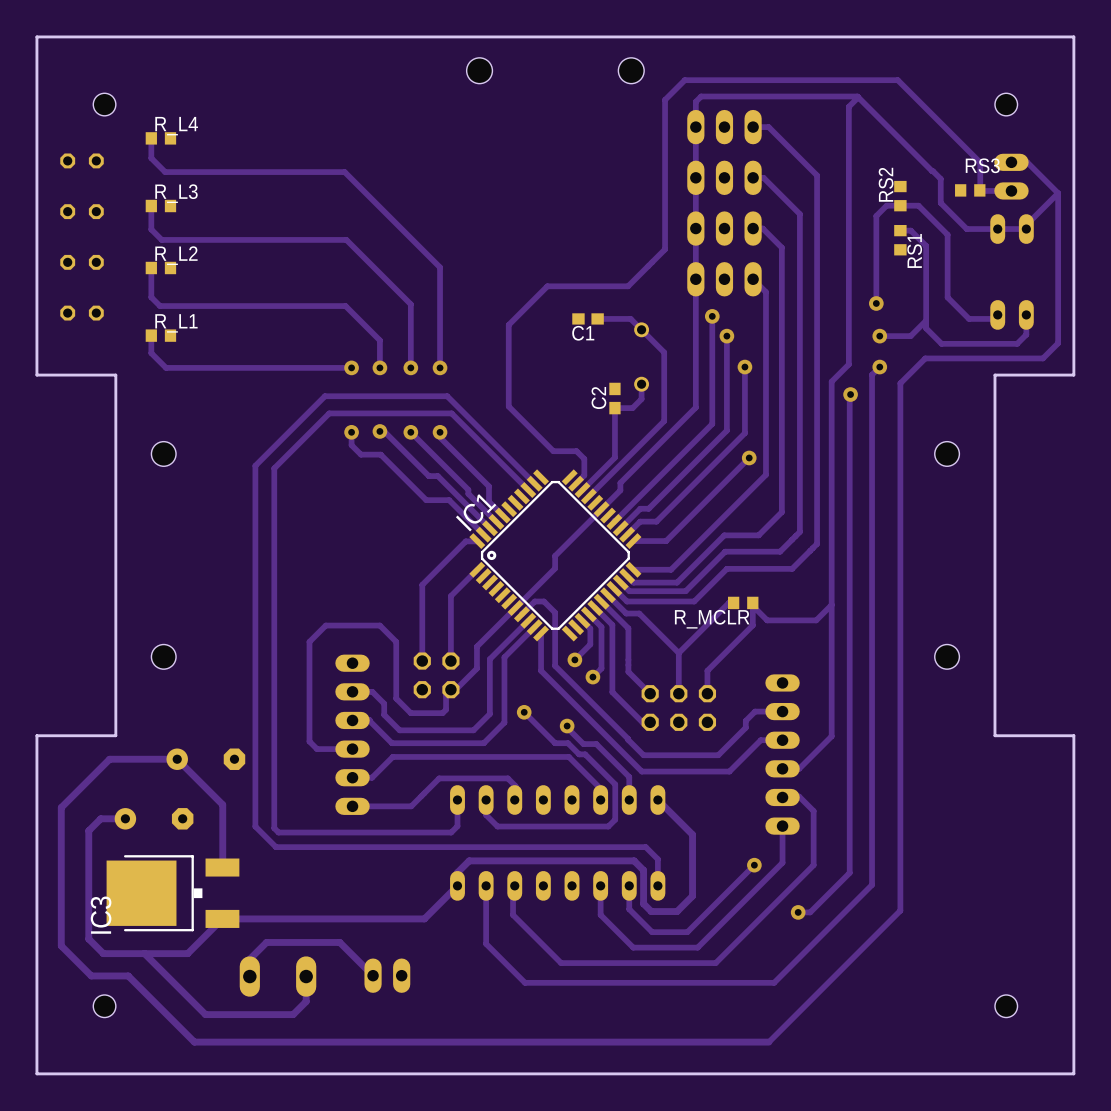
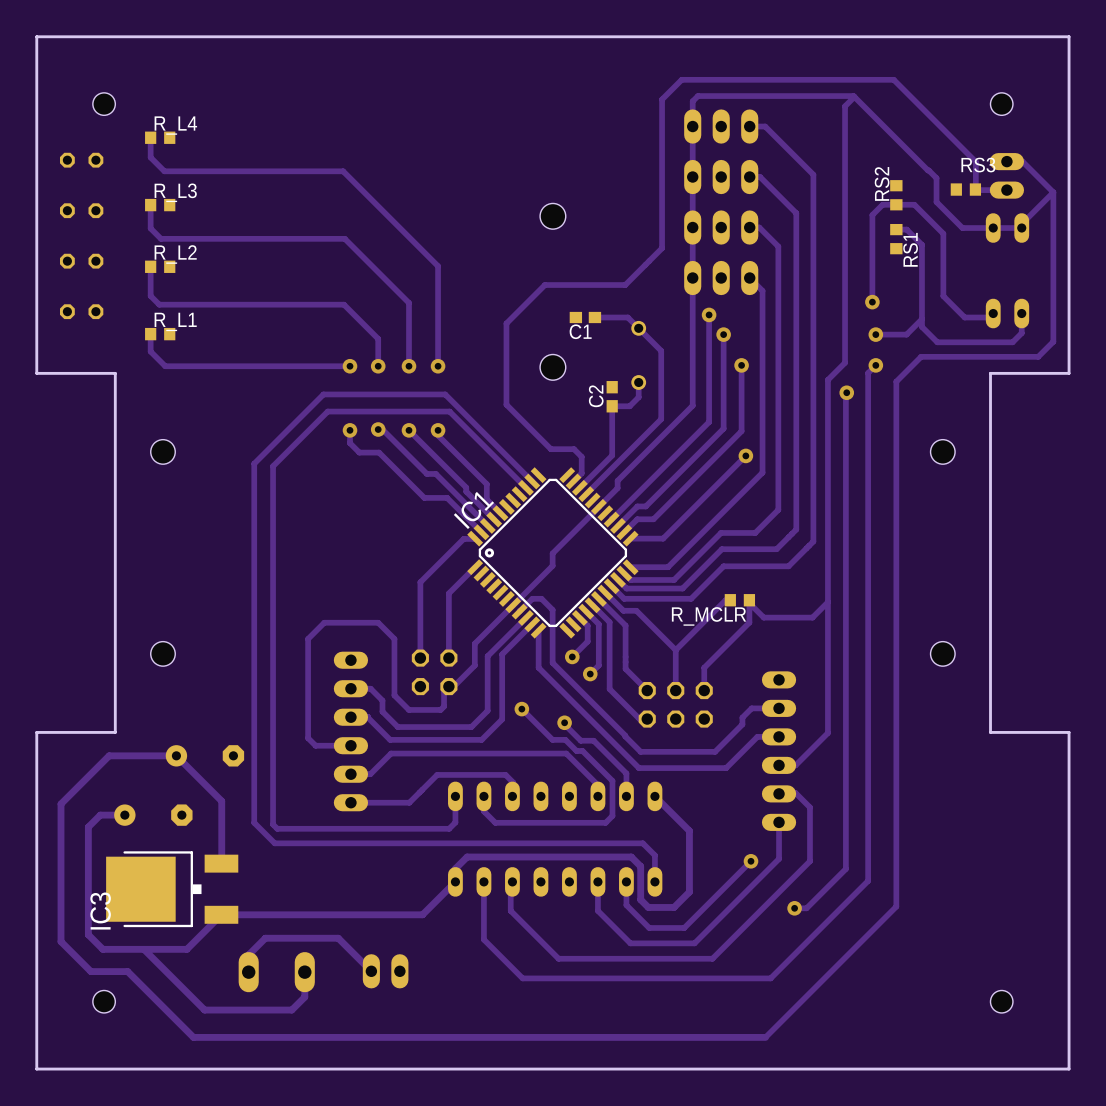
hole: (479, 70) -> none
hole: (631, 70) -> none
hole: none -> (552, 216)
hole: none -> (552, 367)

